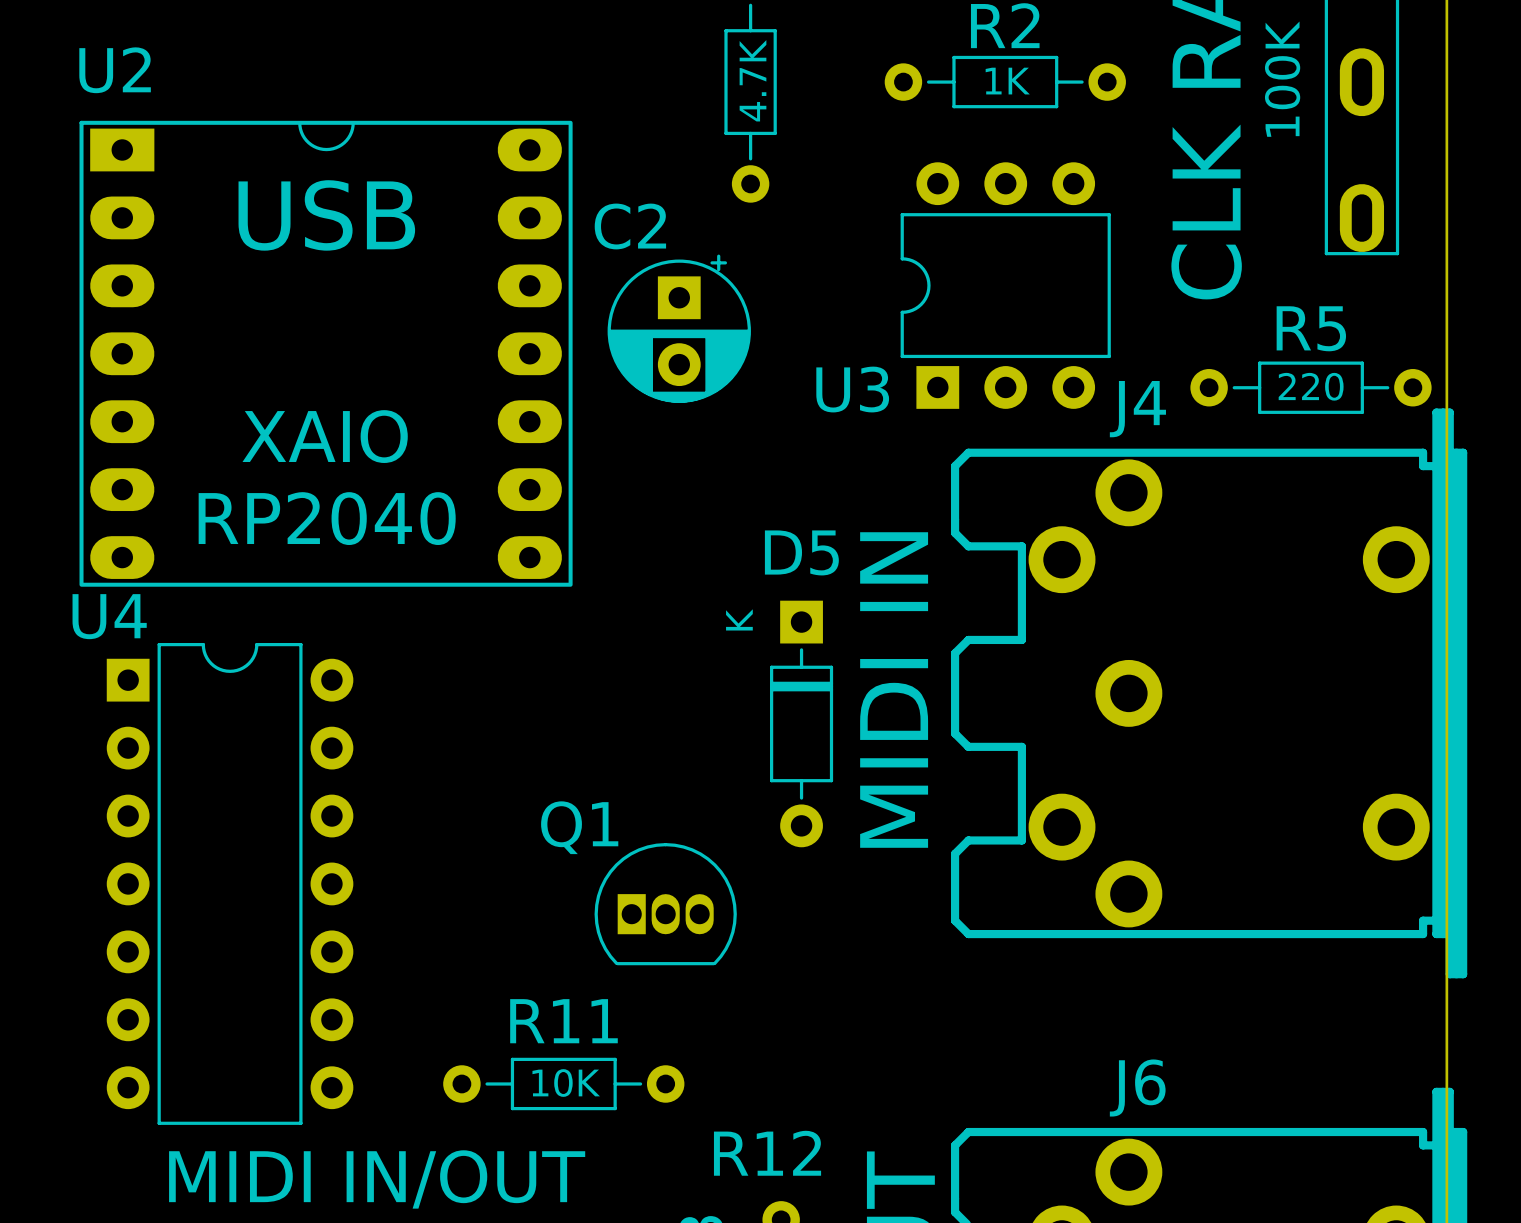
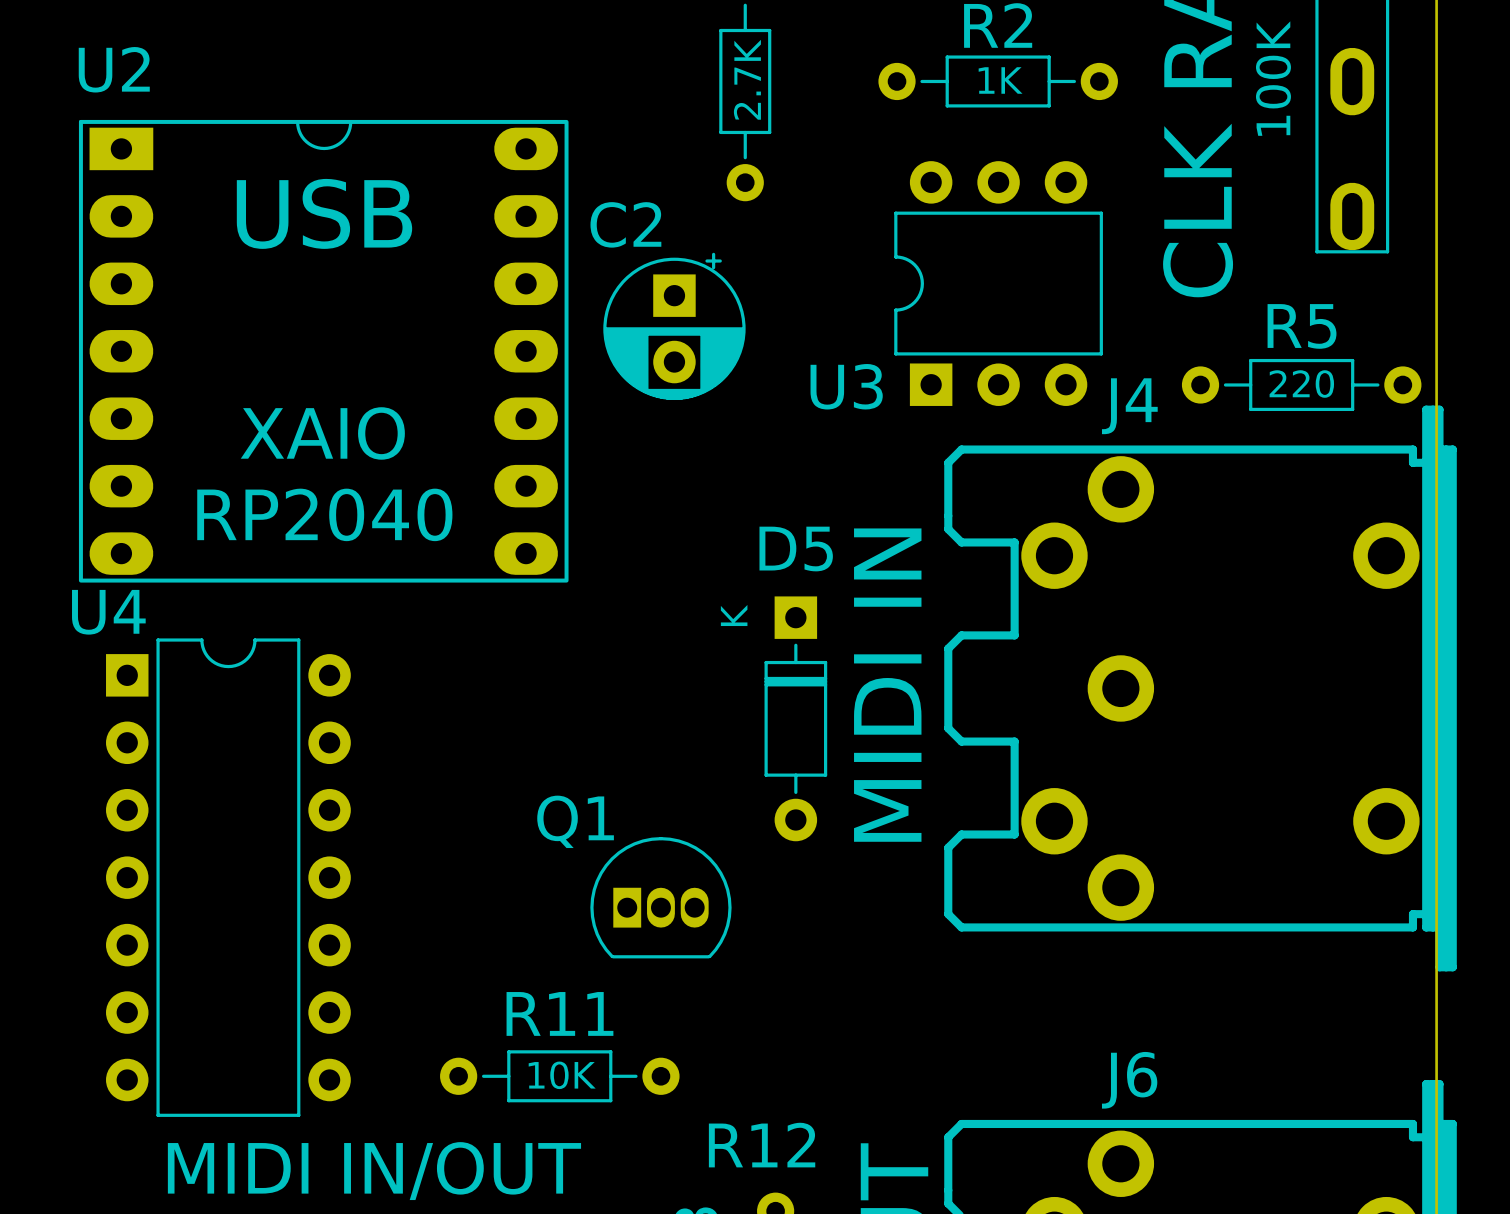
part value: 4.7K (753, 80) -> 2.7K (747, 79)

